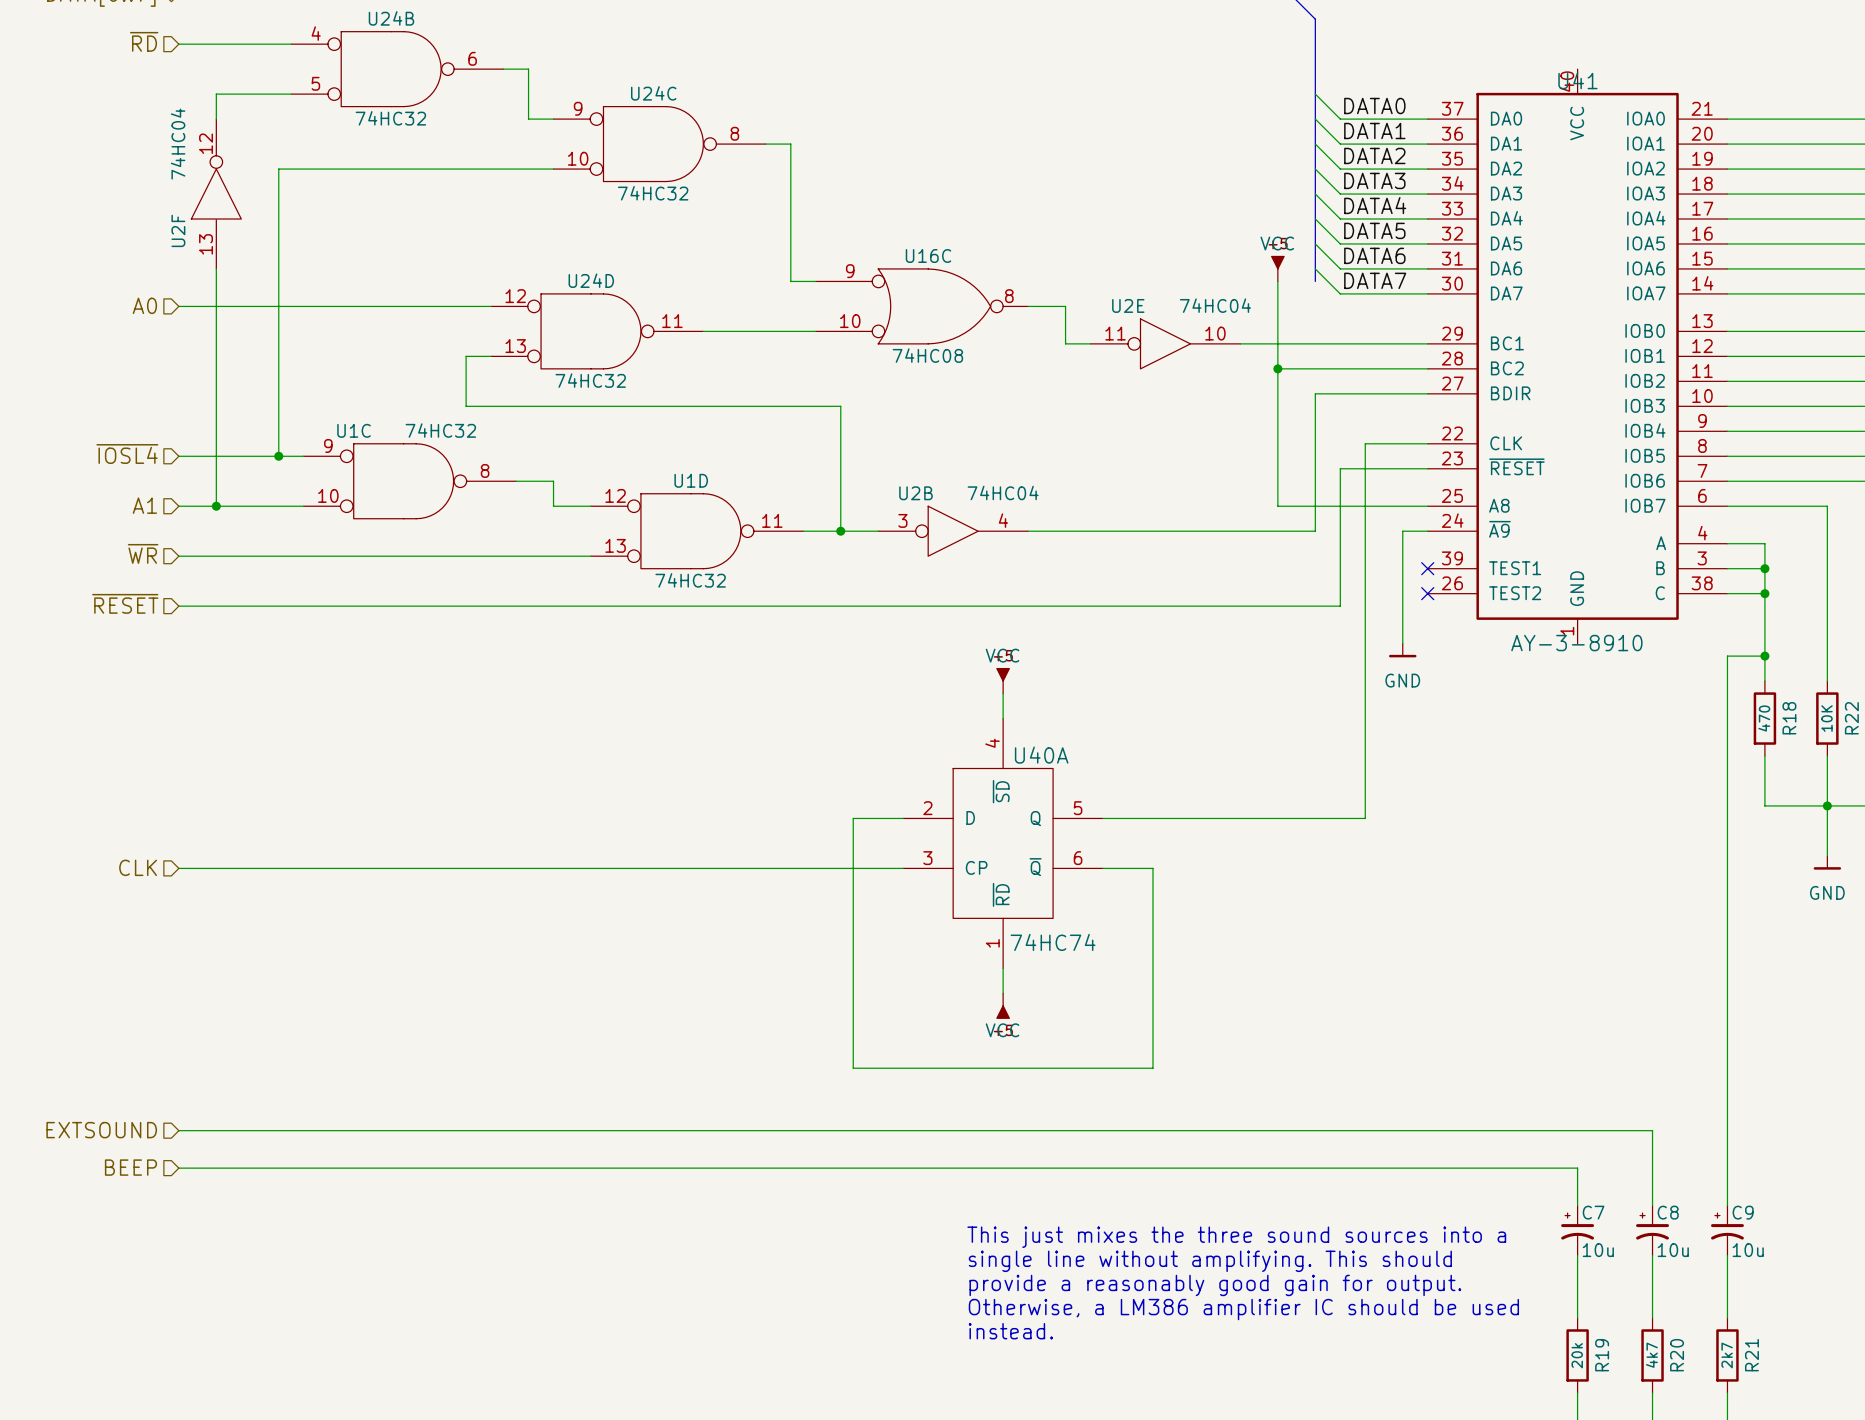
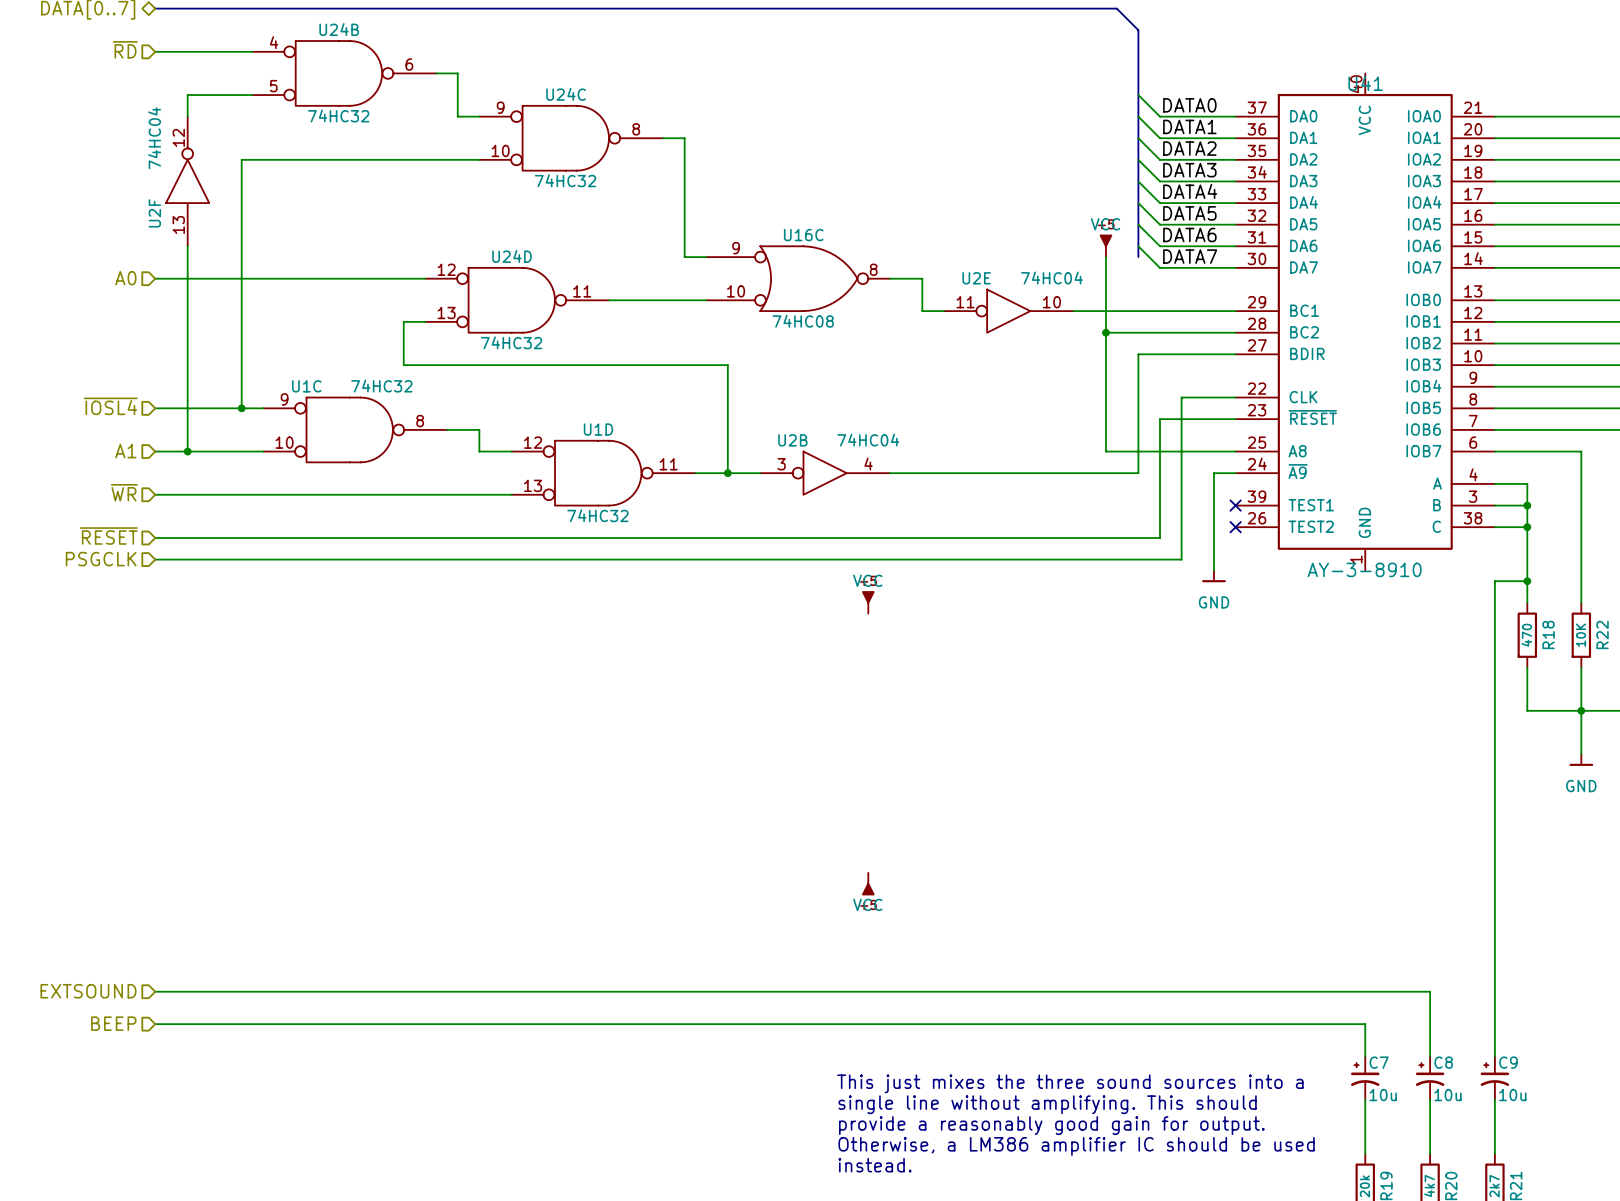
hierarchical label: none -> PSGCLK (101, 559)
wire: (1365, 631) (1365, 818) (1103, 818) -> (1181, 559) (155, 559)
wire: (1003, 693) (1003, 718) -> none
wire: (903, 818) (853, 818) (853, 1068) (1152, 1068) (1152, 868) (1103, 868) -> none
U40A: 74HC74 (1003, 843) -> none
hierarchical label: CLK (138, 867) -> none
wire: (178, 868) (903, 868) -> none
wire: (1003, 968) (1003, 993) -> none

